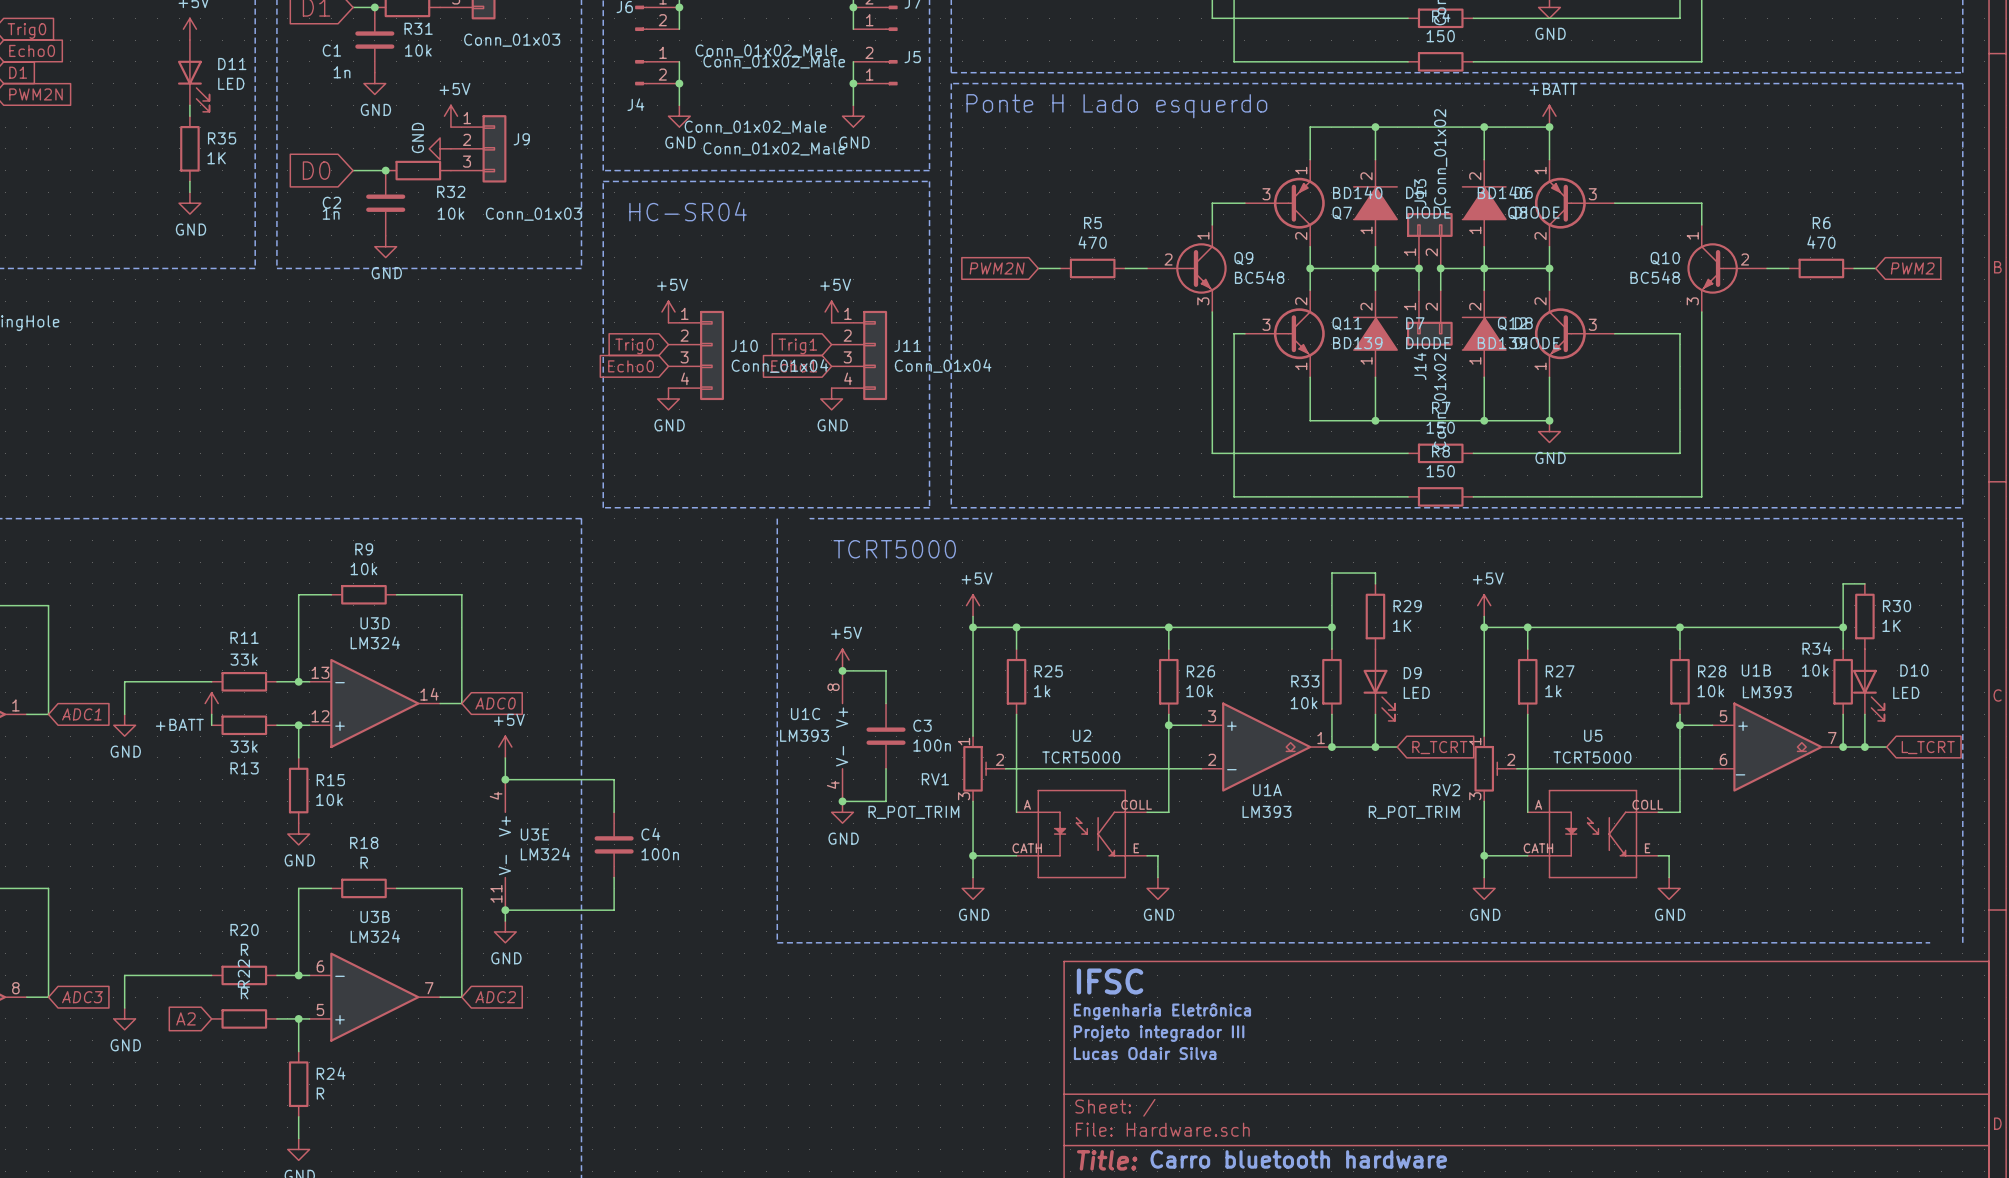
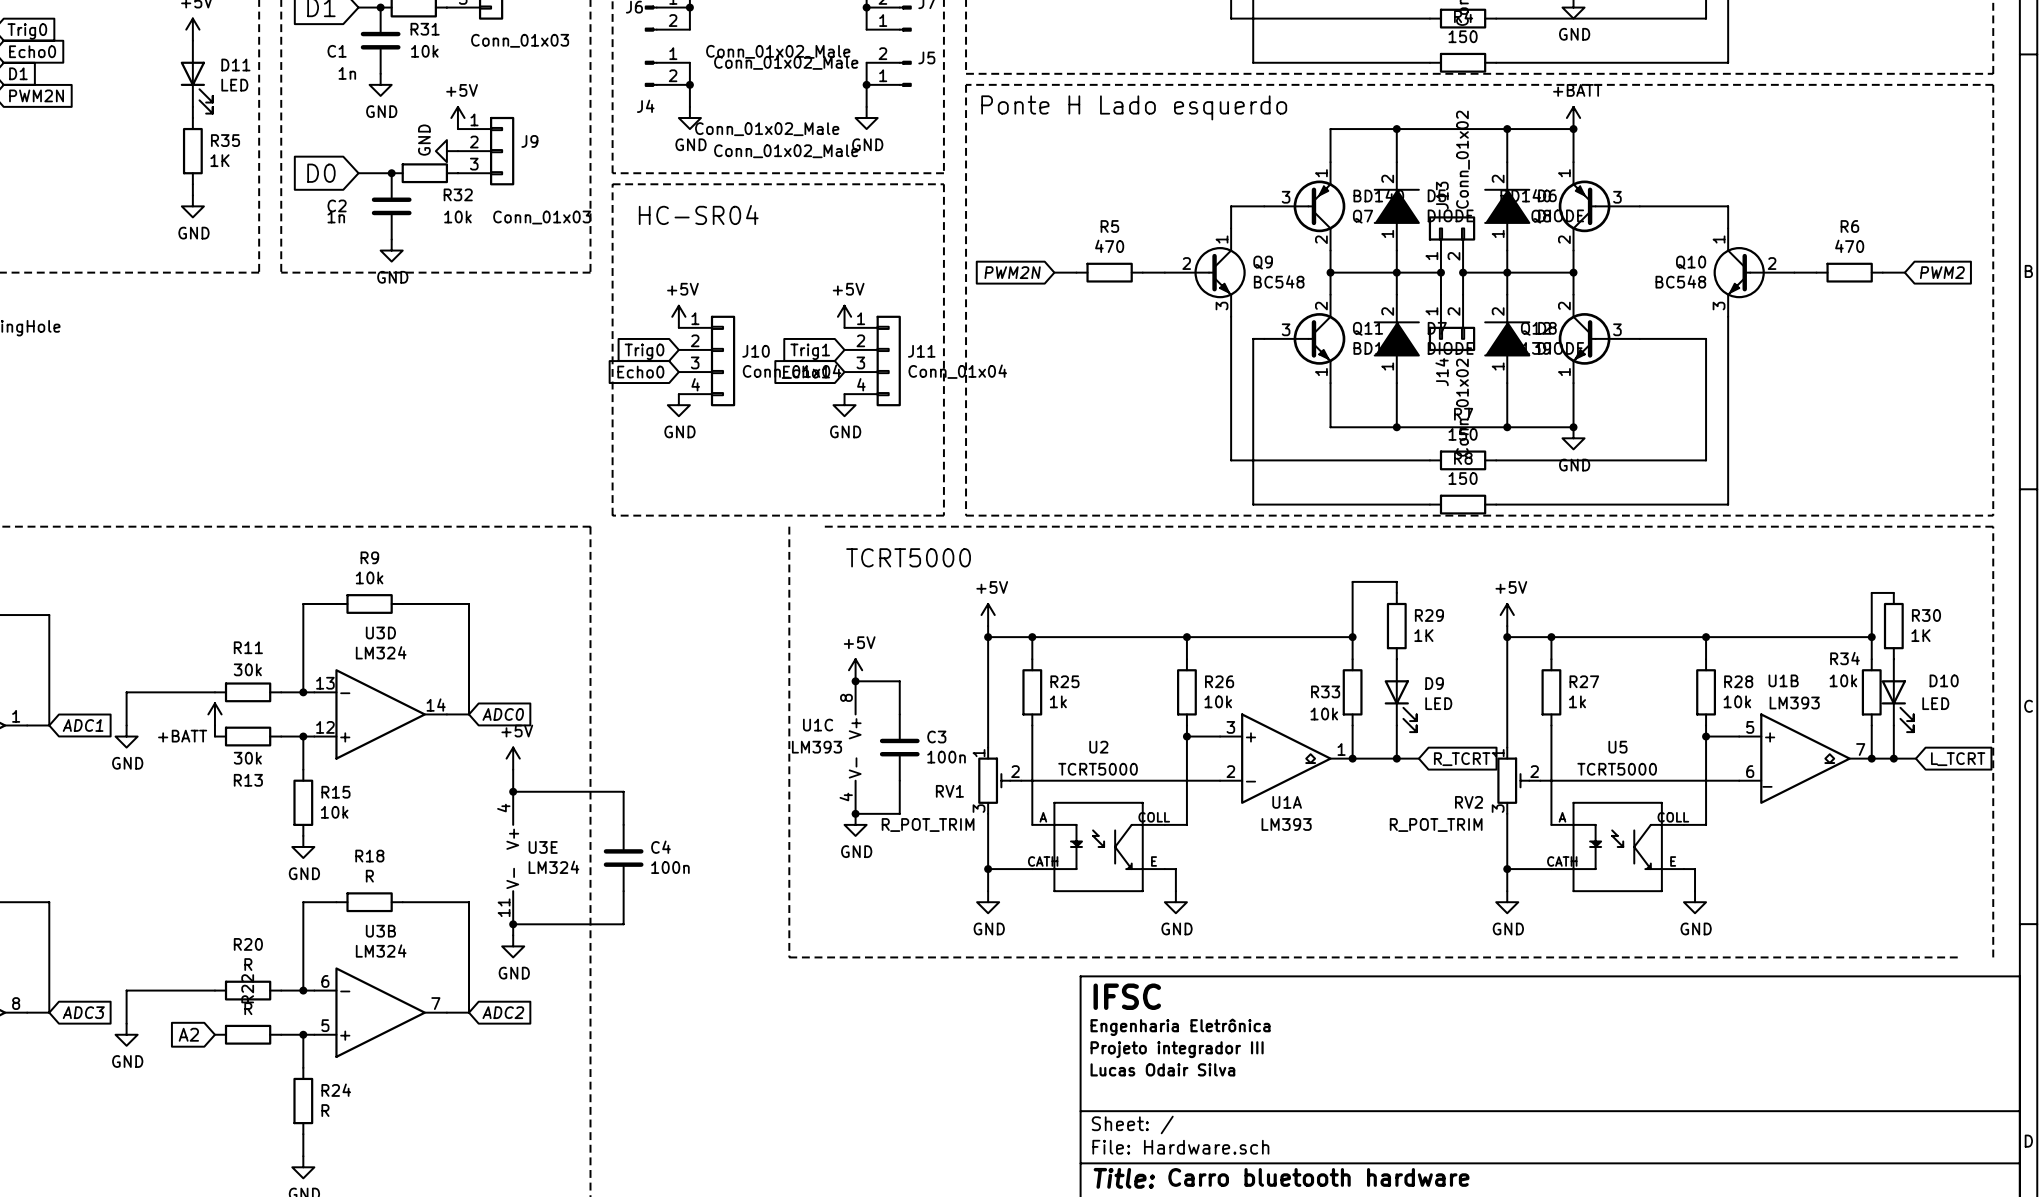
R11 value: 33k (244, 659) -> 30k (247, 669)
R13 value: 33k (244, 746) -> 30k (247, 758)

